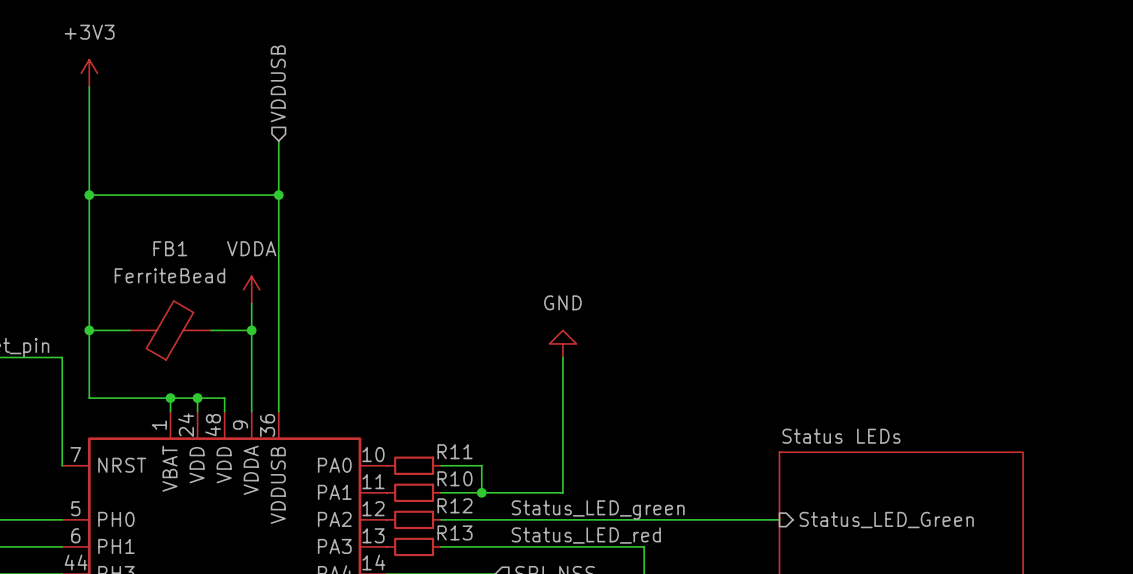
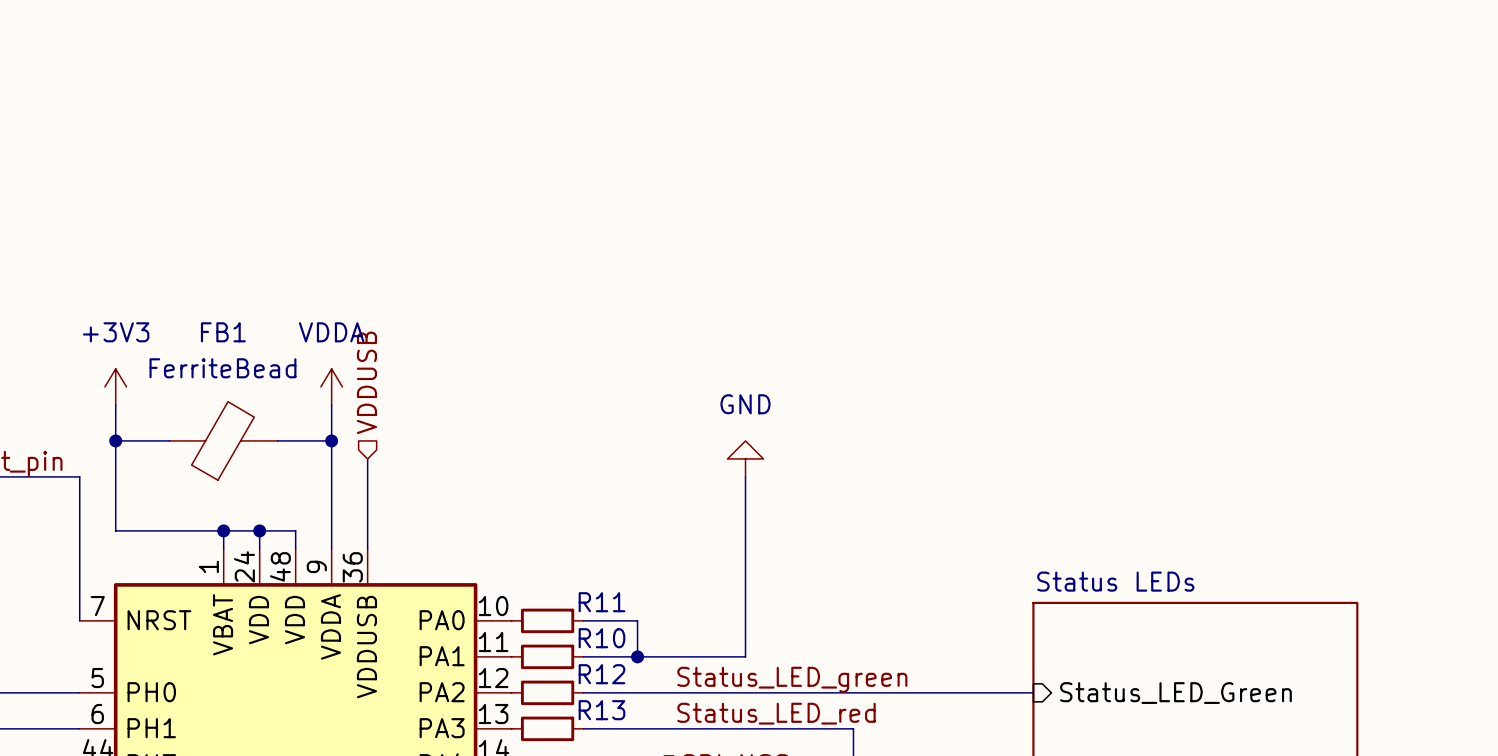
power symbol position: +3V3 (89, 73) -> +3V3 (115, 386)
hierarchical label position: VDDUSB (278, 83) -> VDDUSB (366, 382)
wire: (89, 86) (89, 303) -> none
wire: (278, 140) (278, 343) -> none
wire: (89, 195) (278, 195) -> none
junction: (89, 195) -> none
junction: (278, 195) -> none

